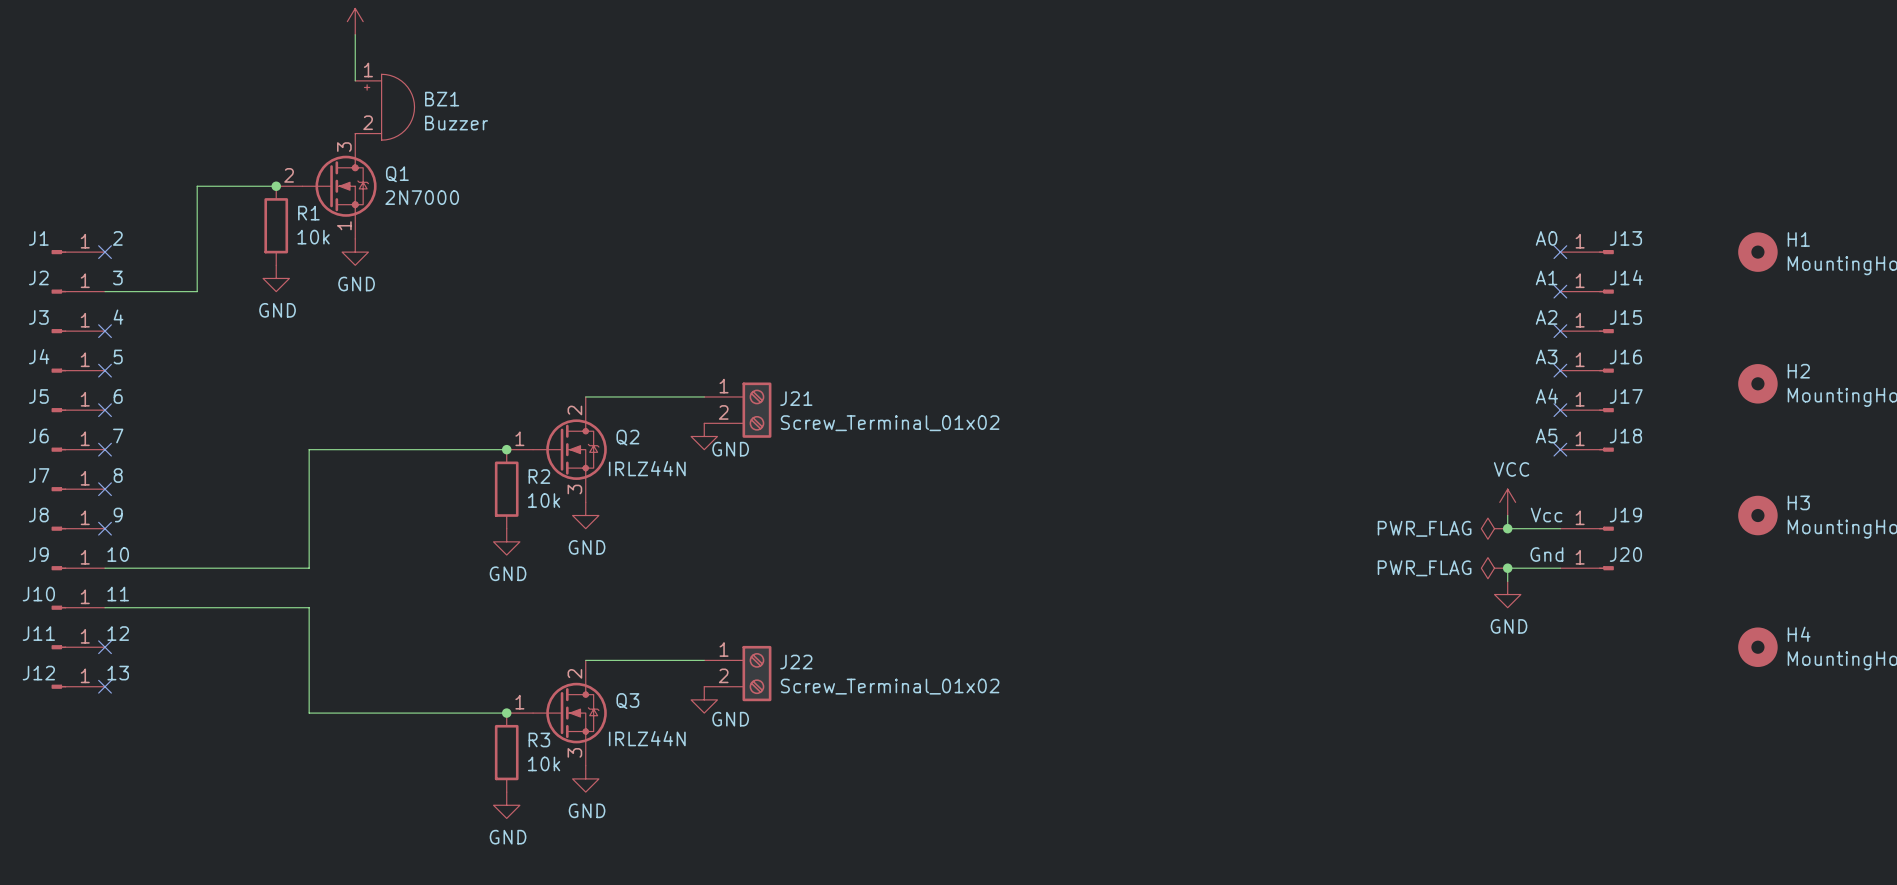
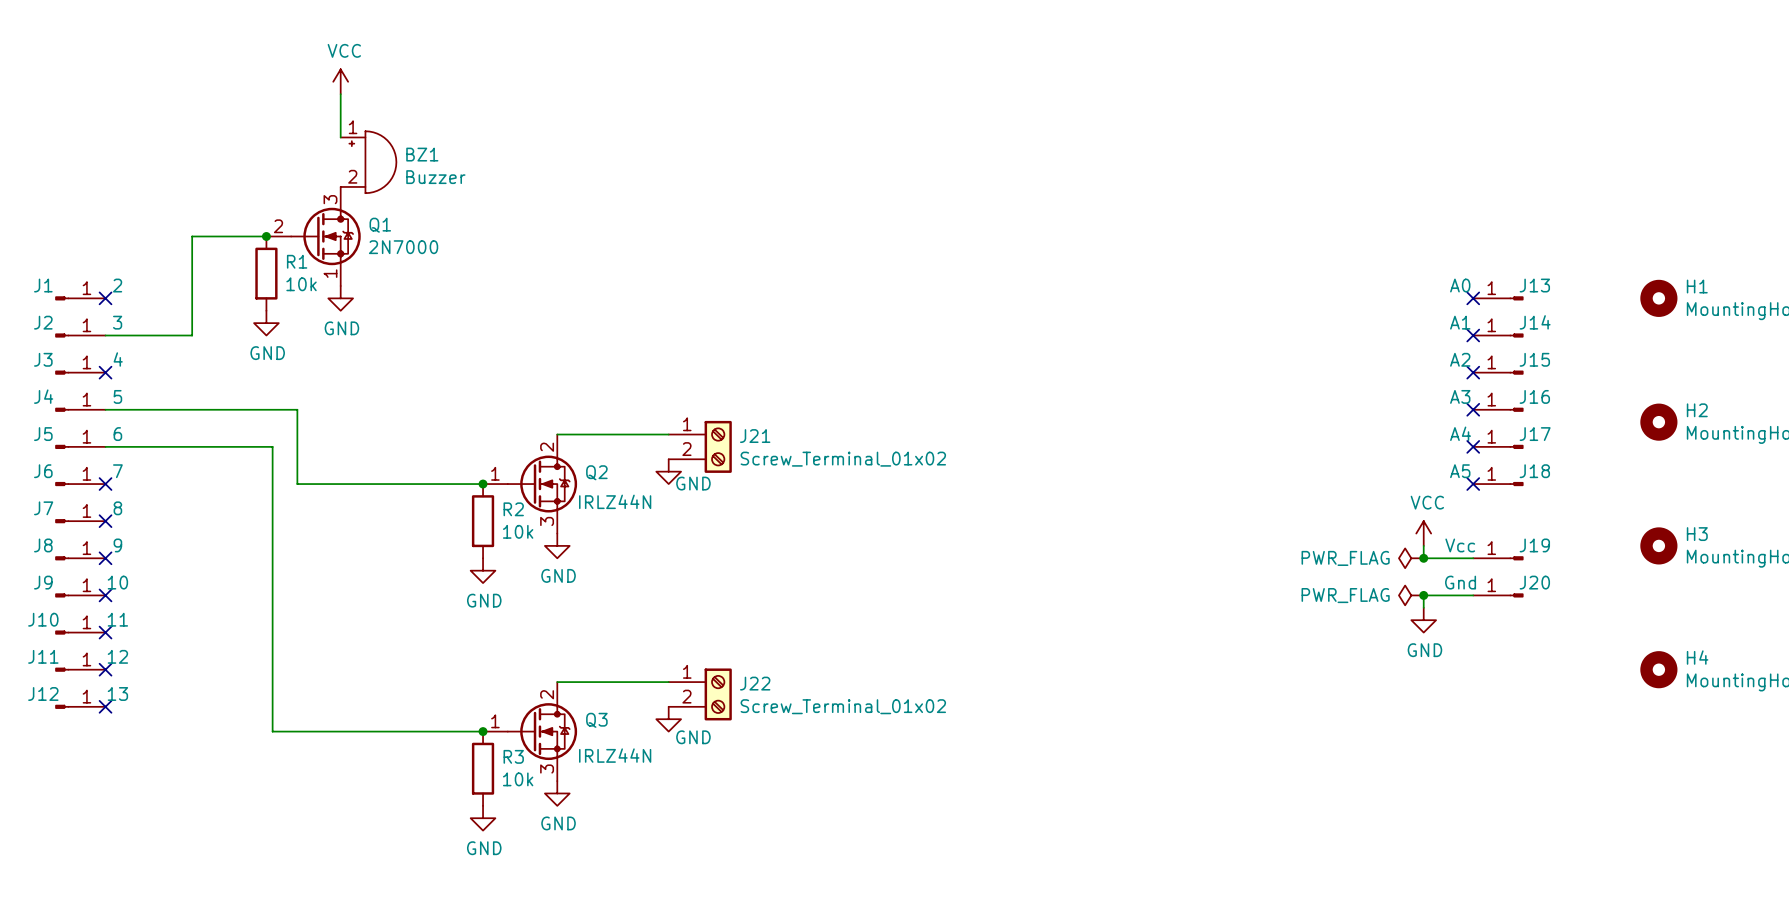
no-connect mark: (105, 370) -> none
no-connect mark: (105, 410) -> none
wire: (309, 449) (309, 568) (105, 568) -> (297, 484) (297, 409) (105, 409)
no-connect mark: none -> (105, 595)
wire: (105, 607) (309, 607) (309, 713) -> (105, 446) (272, 446) (272, 731) (297, 731)
no-connect mark: none -> (105, 632)

